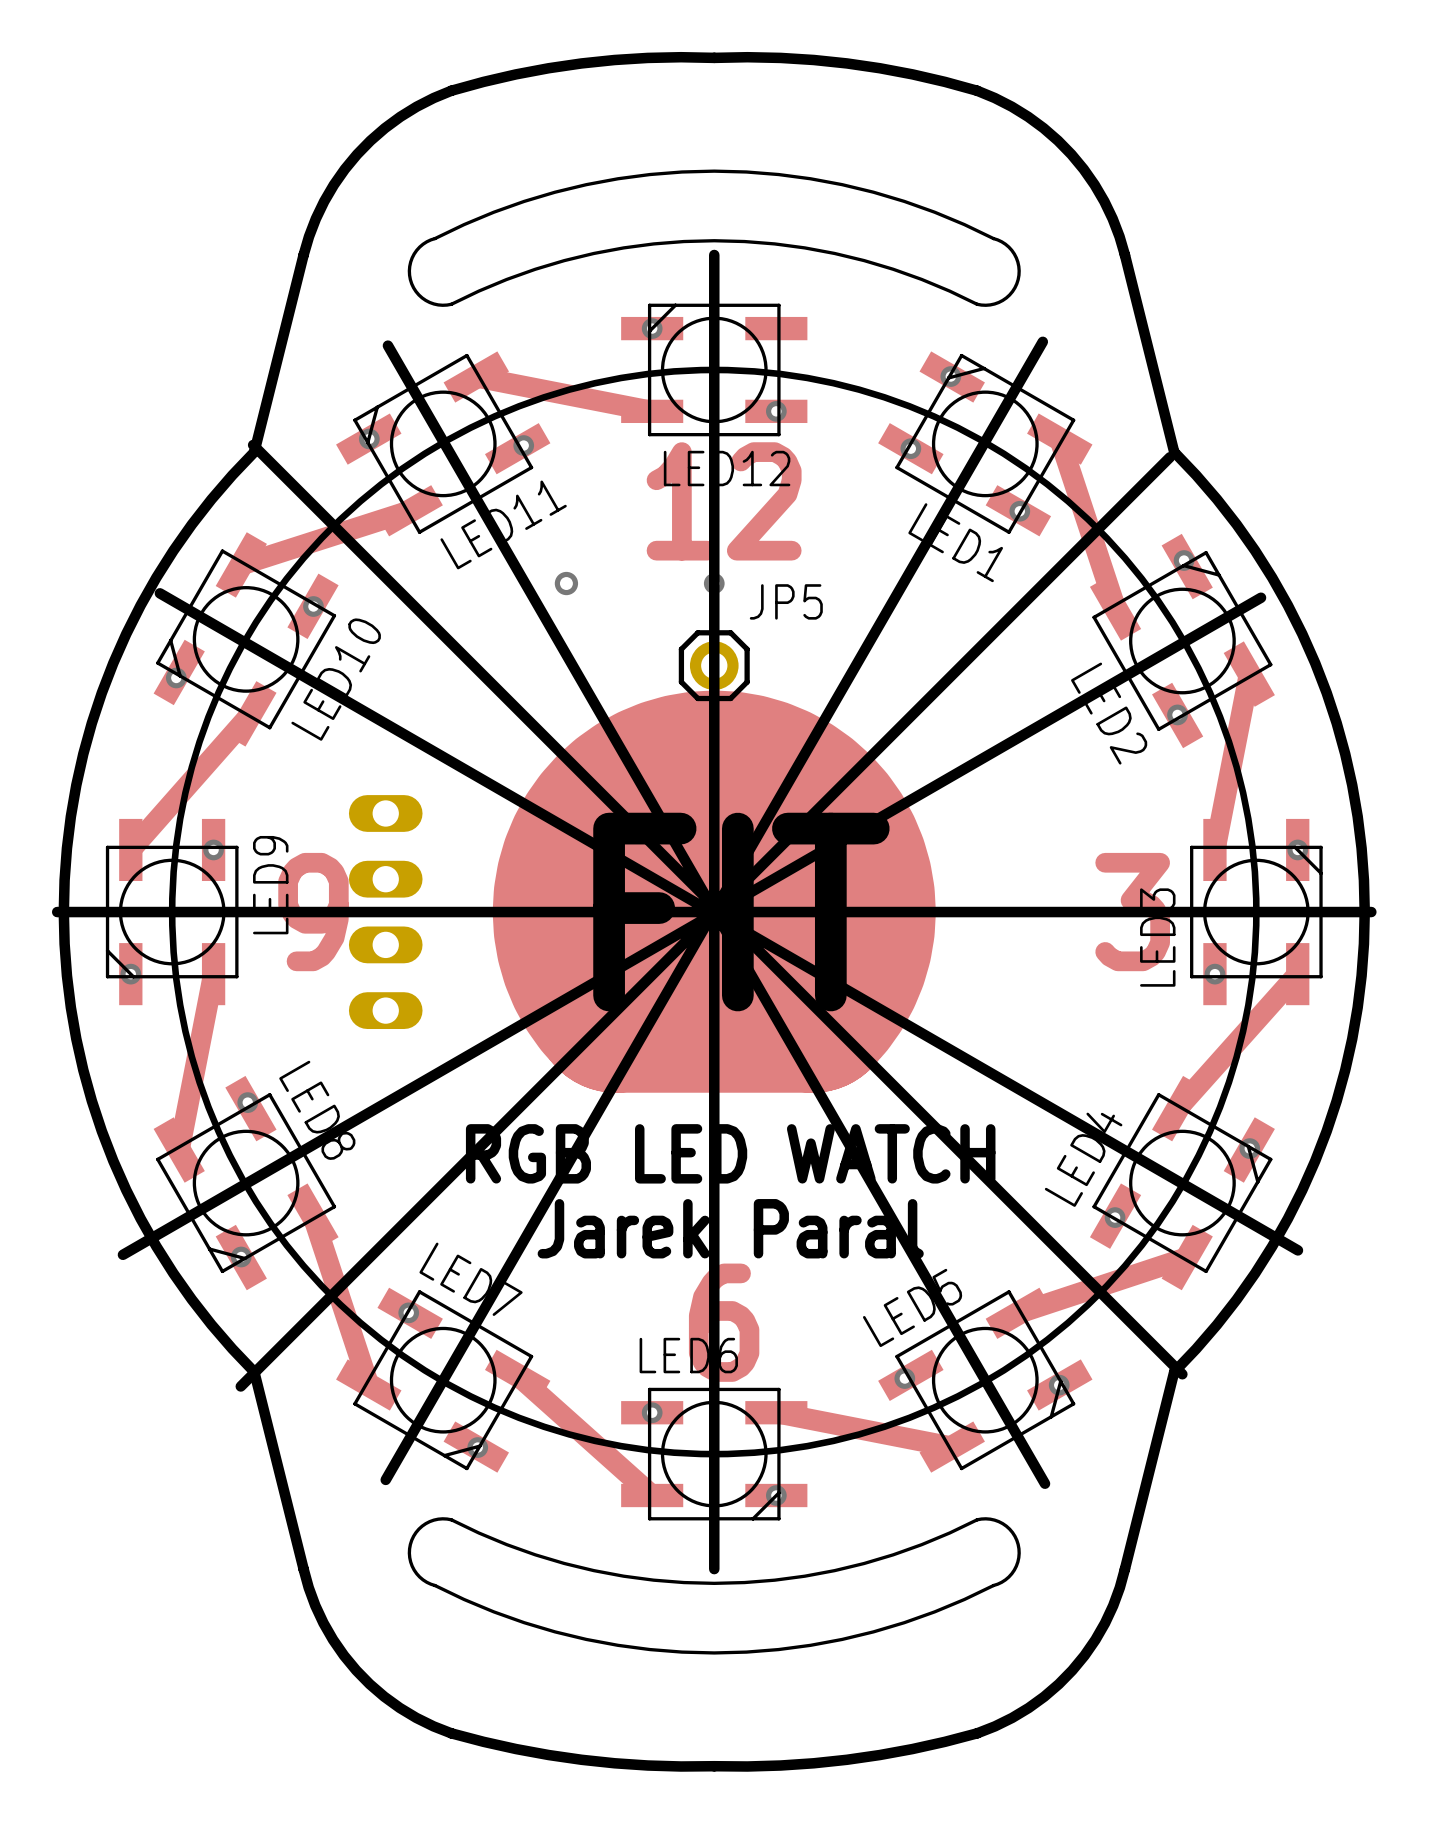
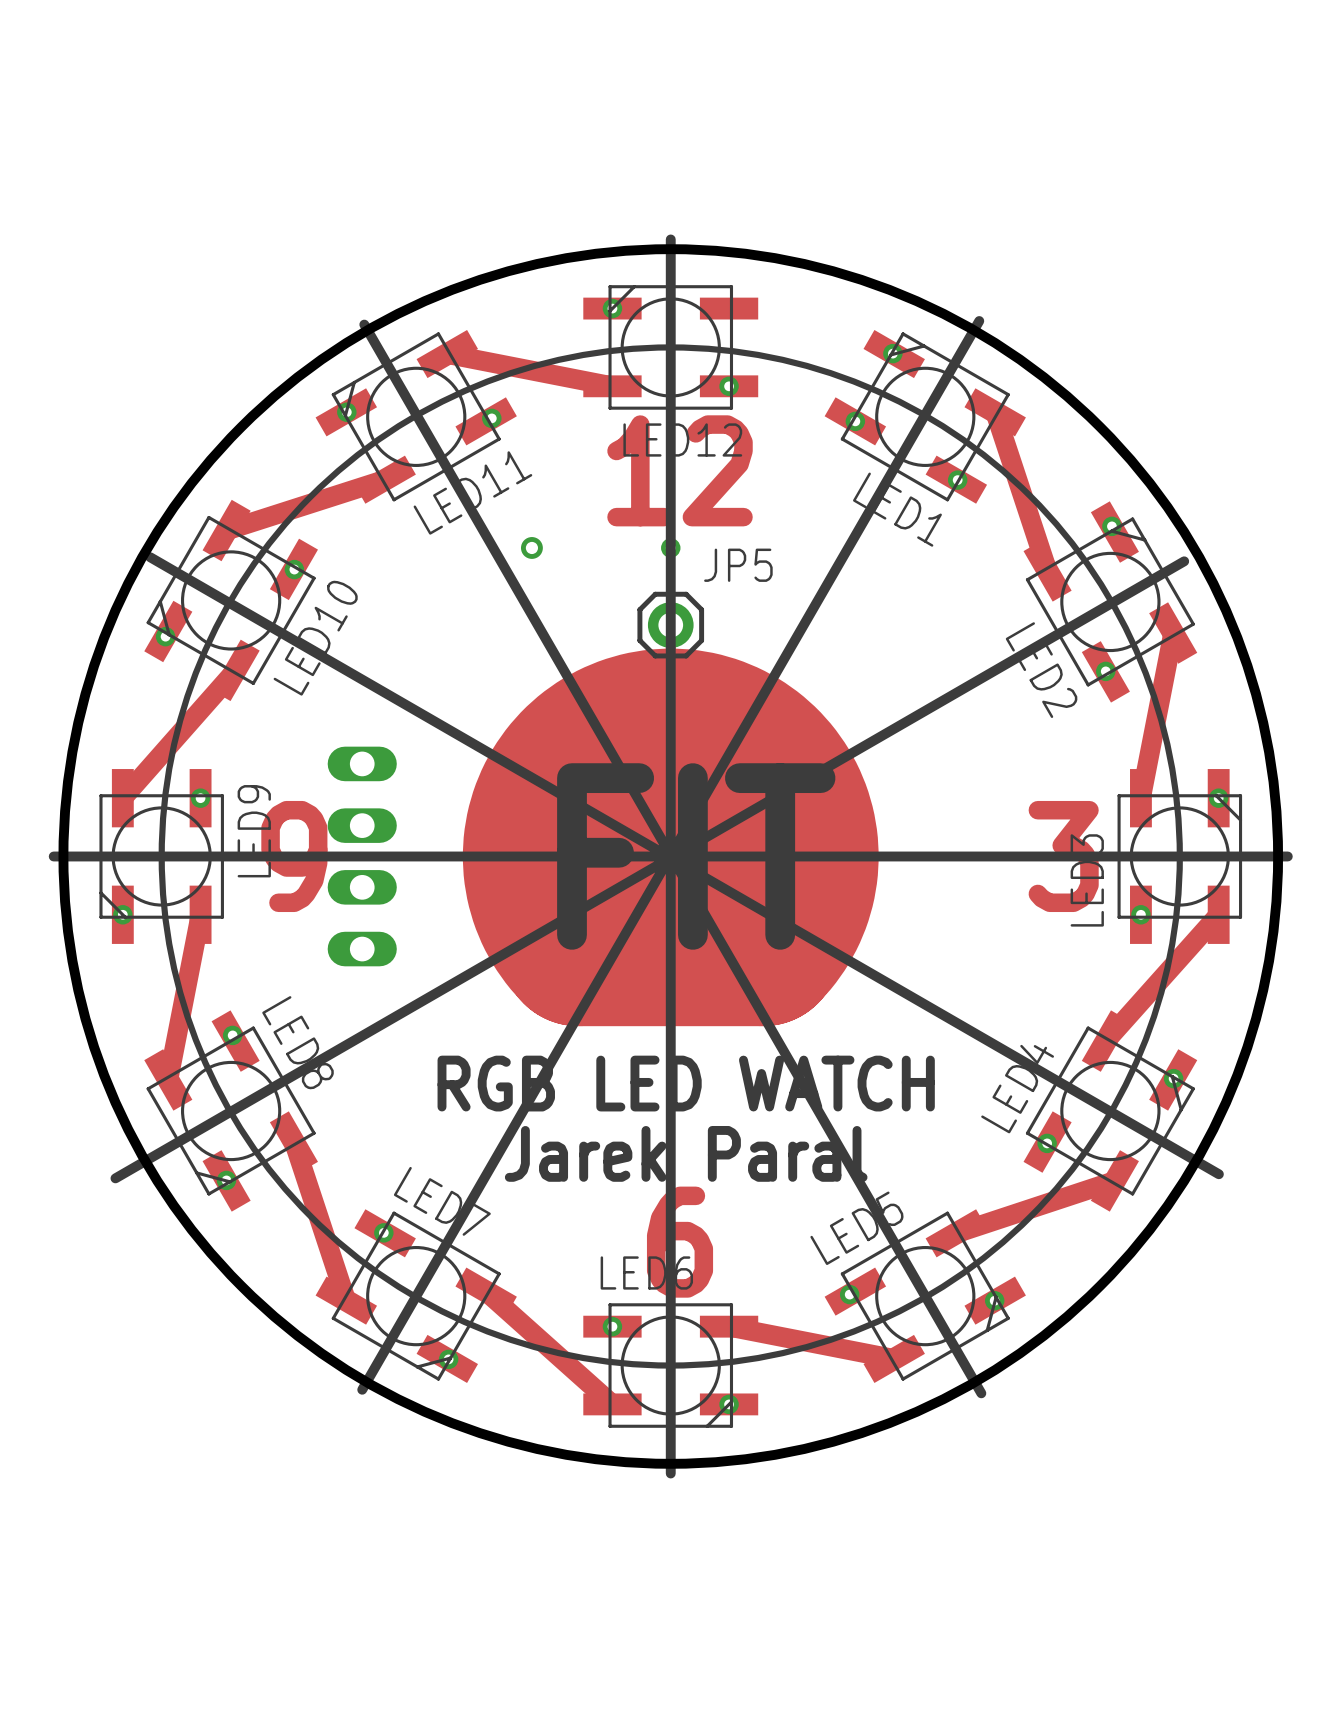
board edge: (714, 57) (647, 57) (581, 63) (515, 74) (451, 90) (416, 106) (384, 128) (370, 140) (344, 169) (324, 201) (309, 236) (254, 452) (211, 499) (173, 550) (140, 605) (126, 633) (101, 692) (83, 754) (70, 816) (64, 880) (63, 912) (64, 943) (70, 1007) (83, 1070) (101, 1131) (126, 1190) (140, 1218) (173, 1273) (211, 1324) (254, 1371) (308, 1587) (323, 1623) (344, 1655) (369, 1684) (399, 1707) (433, 1726) (451, 1733) (516, 1749) (581, 1759) (681, 1766) (780, 1765) (846, 1759) (912, 1749) (977, 1733) (994, 1726) (1028, 1707) (1058, 1684) (1084, 1655) (1105, 1623) (1119, 1587) (1174, 1371) (1217, 1324) (1255, 1273) (1287, 1218) (1302, 1190) (1326, 1131) (1345, 1070) (1357, 1007) (1363, 943) (1364, 912) (1363, 880) (1357, 816) (1345, 754) (1326, 692) (1302, 633) (1287, 605) (1255, 550) (1217, 499) (1174, 452) (1119, 236) (1104, 201) (1083, 169) (1058, 140) (1043, 128) (1011, 106) (977, 90) (912, 74) (847, 63) (780, 57) (714, 57) -> none
board edge: (435, 238) (464, 224) (524, 201) (586, 184) (618, 178) (682, 171) (746, 171) (810, 178) (842, 184) (873, 192) (934, 212) (1005, 244) (1016, 257) (1018, 275) (1014, 287) (1006, 297) (994, 303) (981, 305) (893, 269) (834, 253) (804, 247) (744, 241) (683, 241) (623, 247) (564, 260) (506, 279) (451, 304) (442, 305) (429, 302) (418, 294) (413, 287) (409, 275) (410, 262) (416, 250) (426, 241) (435, 238) -> none
round board edge: none -> [58, 244, 1284, 1469]
line: (253, 445) (1182, 1374) -> none
line: (1170, 457) (240, 1386) -> none
board edge: (451, 1519) (506, 1544) (564, 1563) (623, 1576) (683, 1582) (744, 1582) (804, 1576) (834, 1570) (893, 1554) (981, 1519) (994, 1520) (1009, 1529) (1016, 1540) (1019, 1553) (1014, 1570) (1001, 1582) (934, 1611) (873, 1631) (810, 1645) (778, 1649) (714, 1652) (682, 1652) (618, 1645) (555, 1631) (493, 1611) (426, 1582) (416, 1573) (410, 1561) (409, 1548) (411, 1540) (418, 1529) (425, 1523) (438, 1519) (451, 1519) -> none

